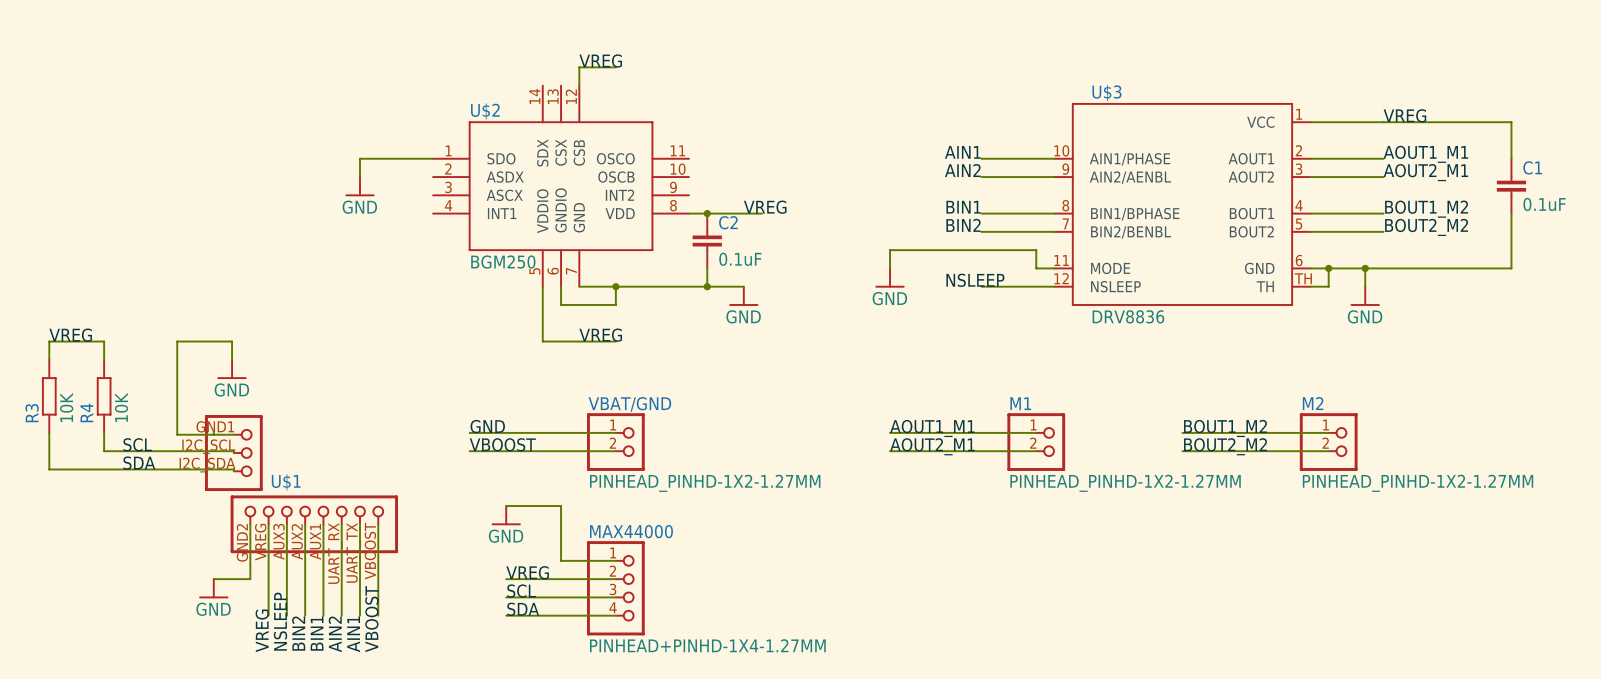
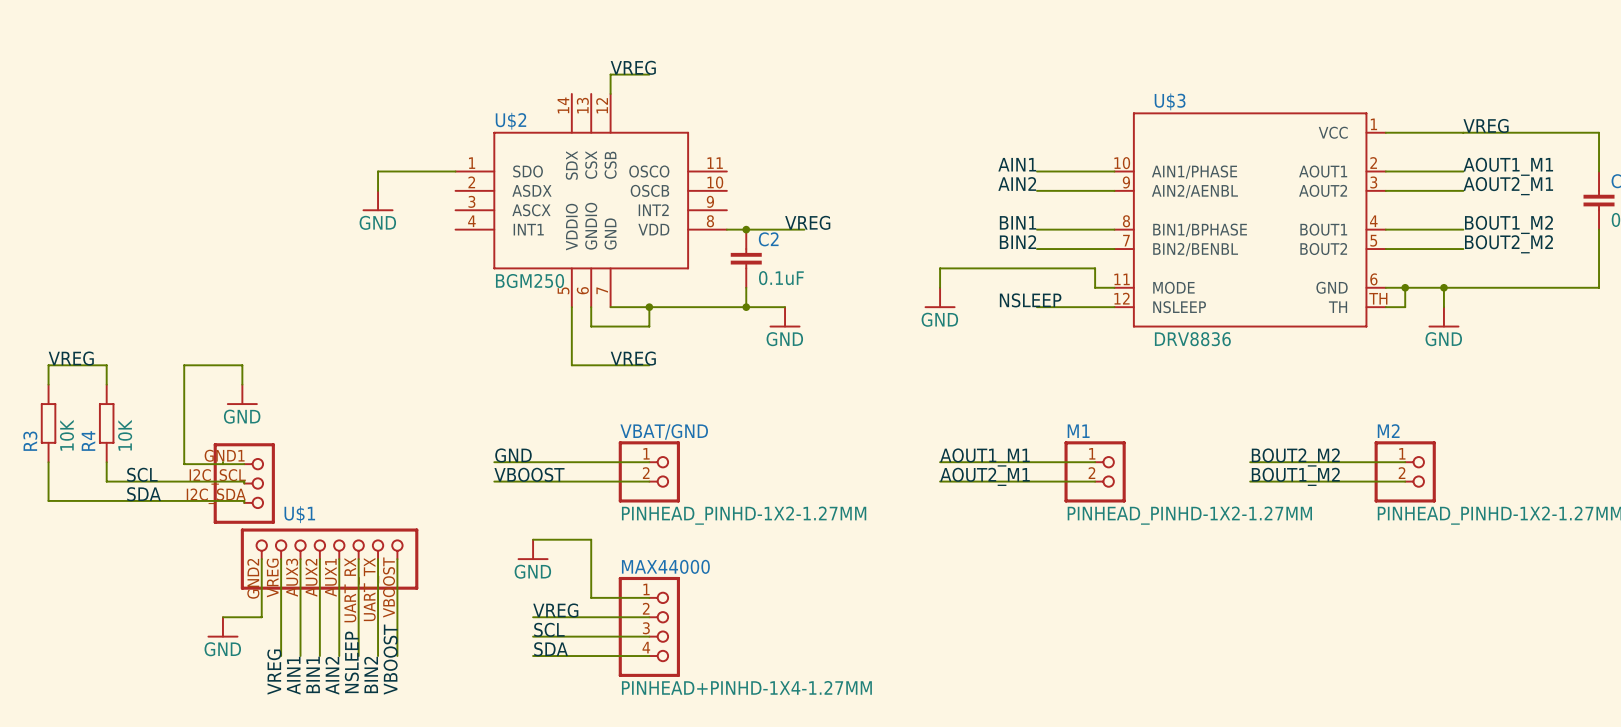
label: BOUT1_M2 (1225, 428) -> BOUT2_M2 (1295, 457)
label: BOUT2_M2 (1225, 446) -> BOUT1_M2 (1295, 476)
label: NSLEEP (280, 621) -> AIN1 (293, 675)
label: BIN2 (298, 633) -> BIN1 (313, 674)
label: BIN1 (317, 633) -> AIN2 (332, 675)
label: AIN2 (335, 634) -> NSLEEP (351, 662)
label: AIN1 (353, 634) -> BIN2 (371, 674)

